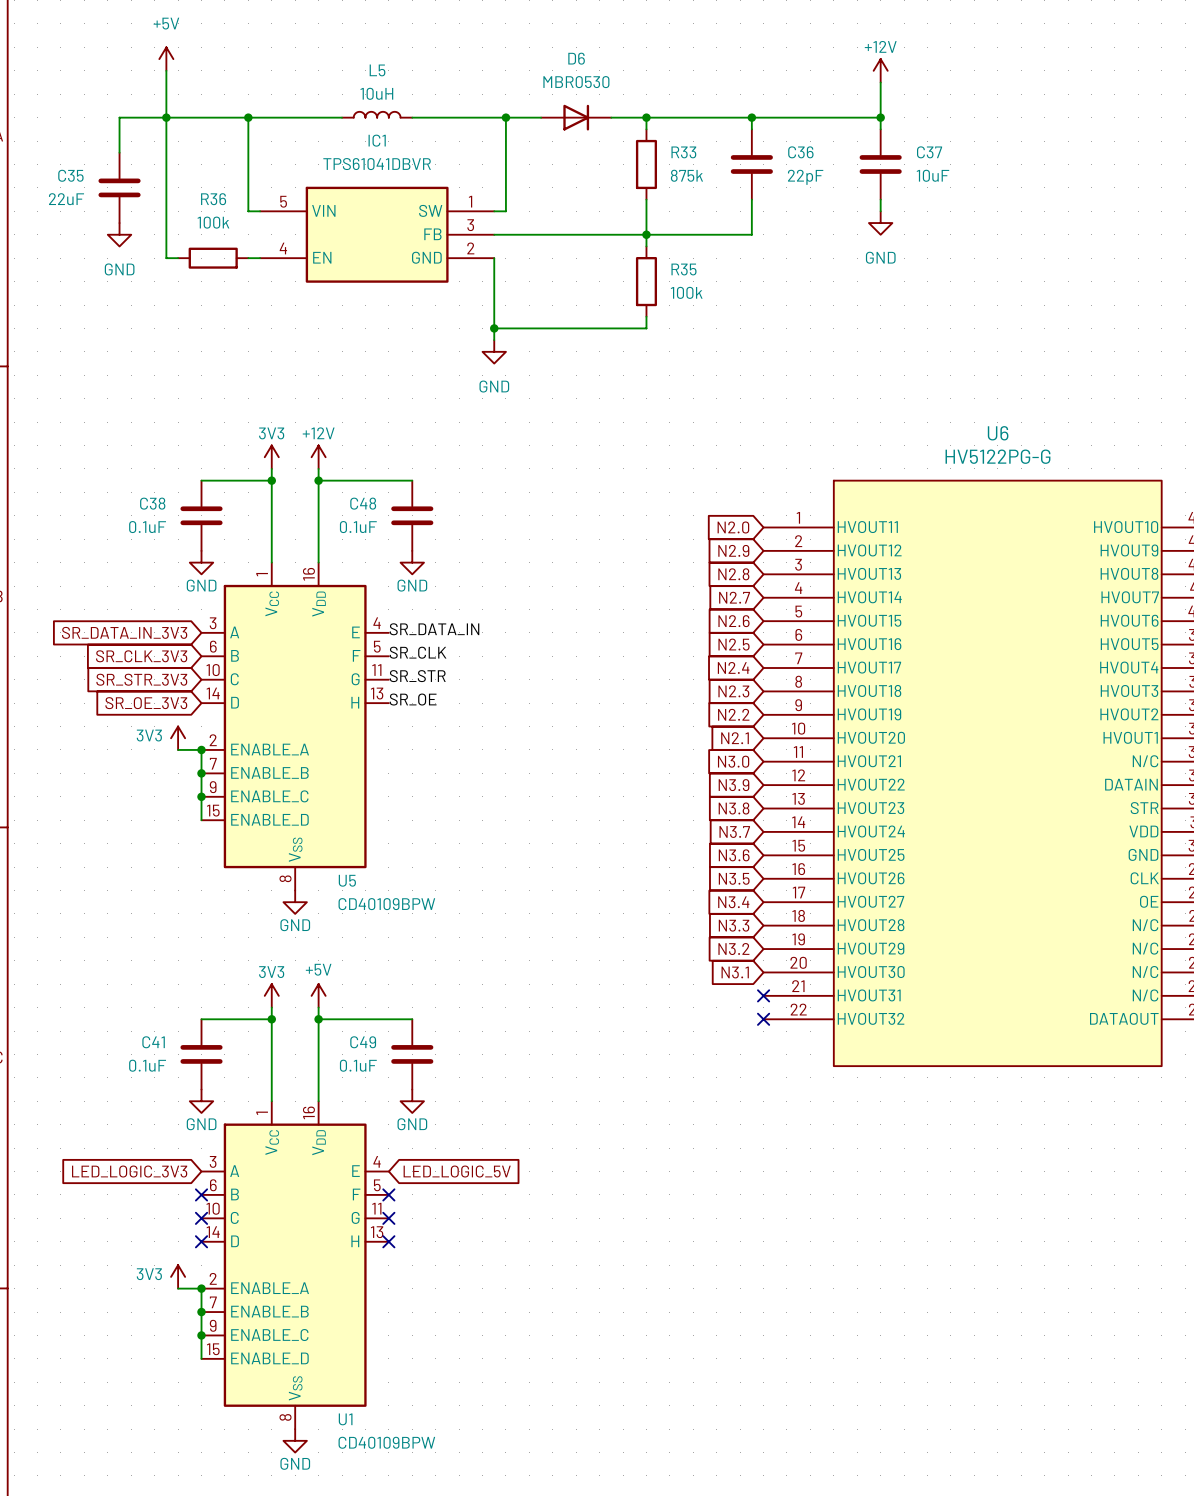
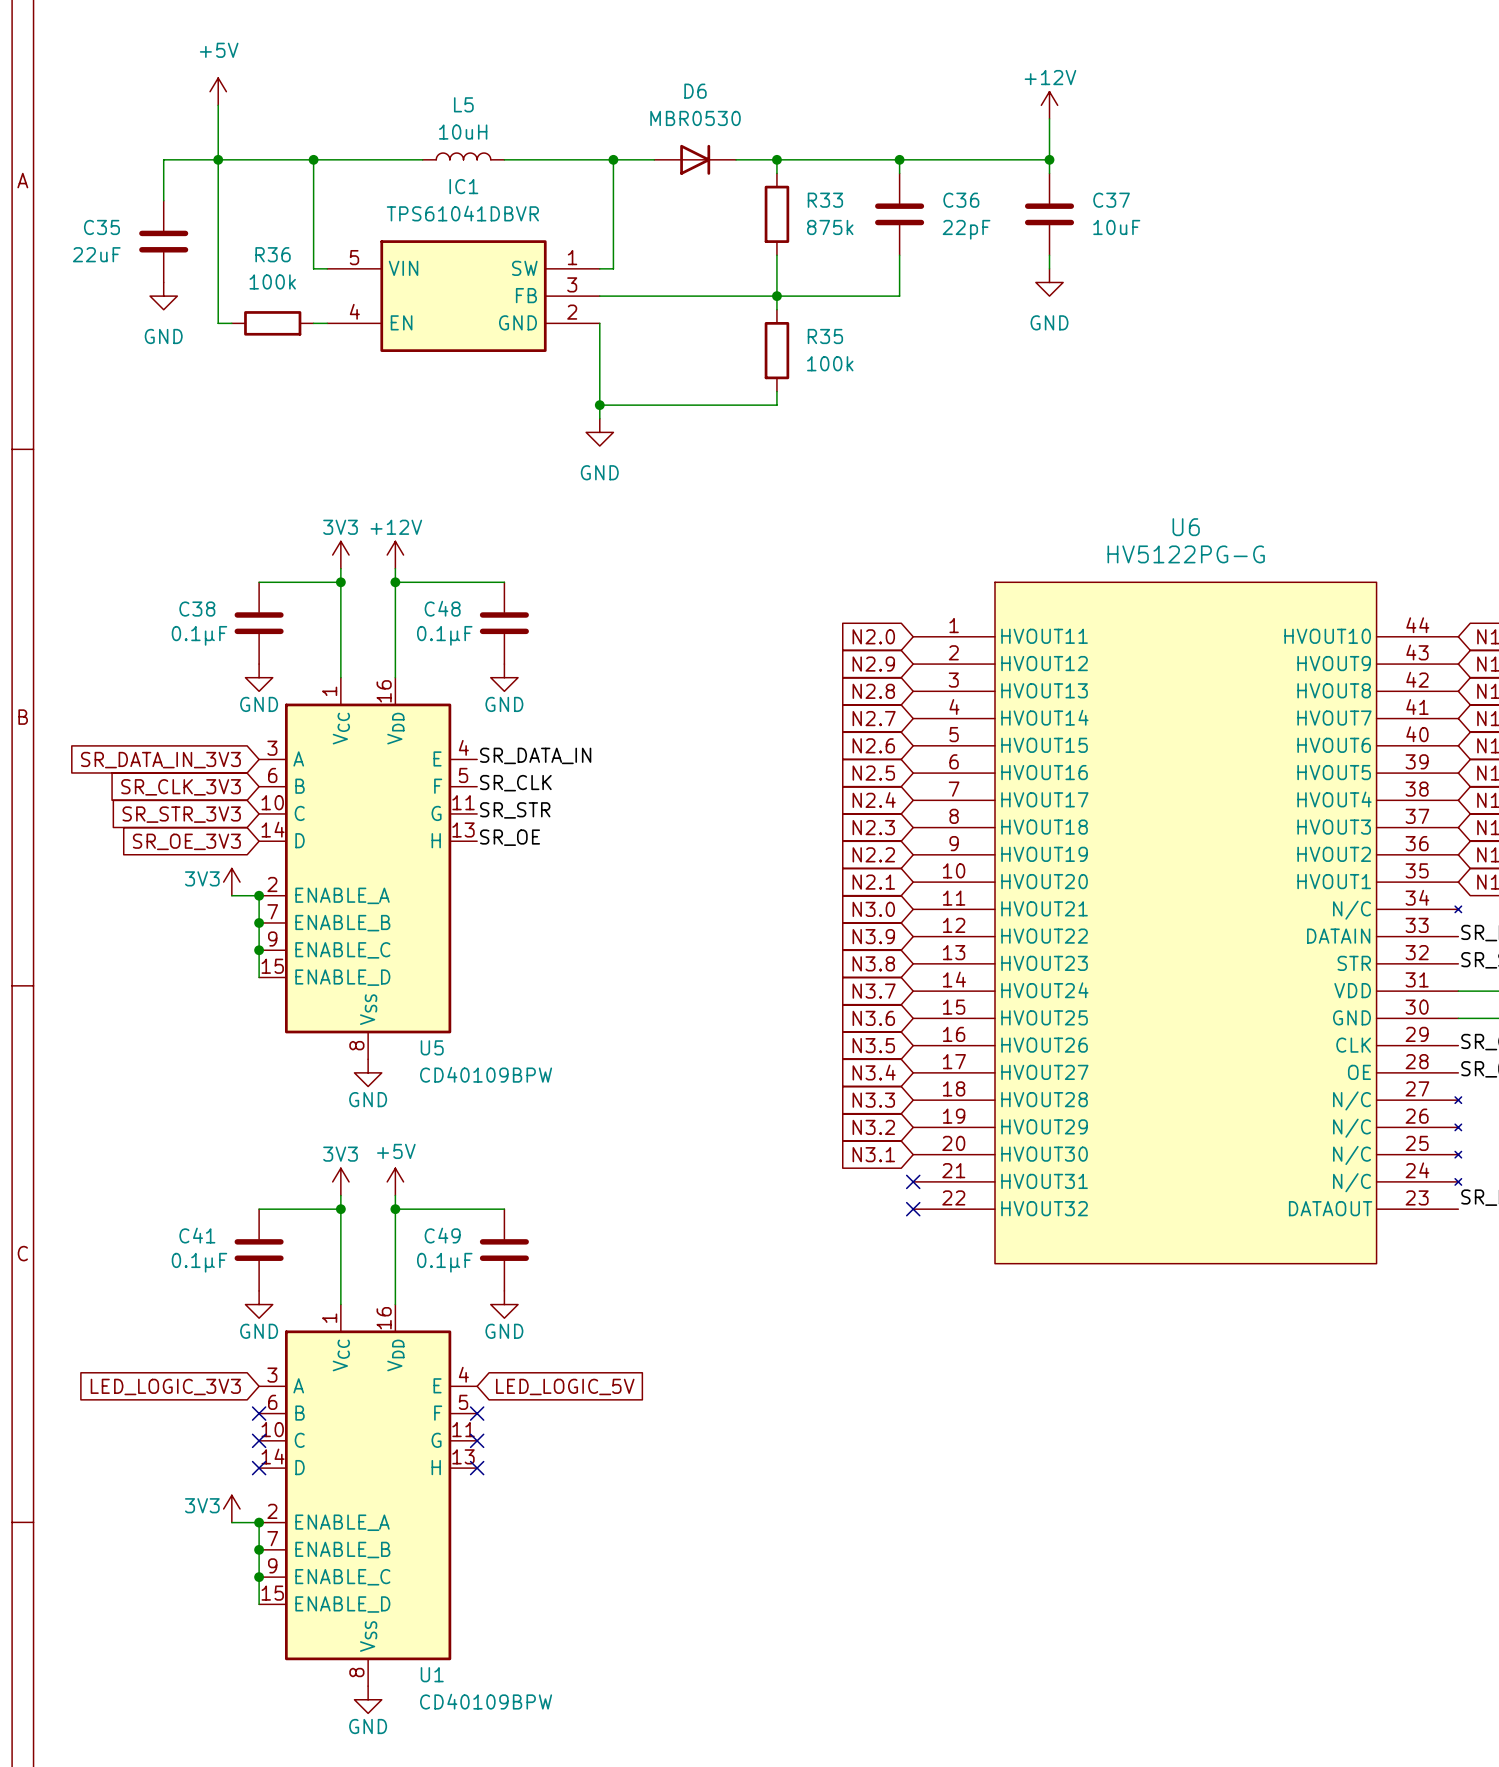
C38 value: 0.1uF (147, 527) -> 0.1µF (199, 635)
C48 value: 0.1uF (358, 527) -> 0.1µF (444, 635)
C41 value: 0.1uF (147, 1065) -> 0.1µF (199, 1262)
C49 value: 0.1uF (358, 1065) -> 0.1µF (444, 1262)

